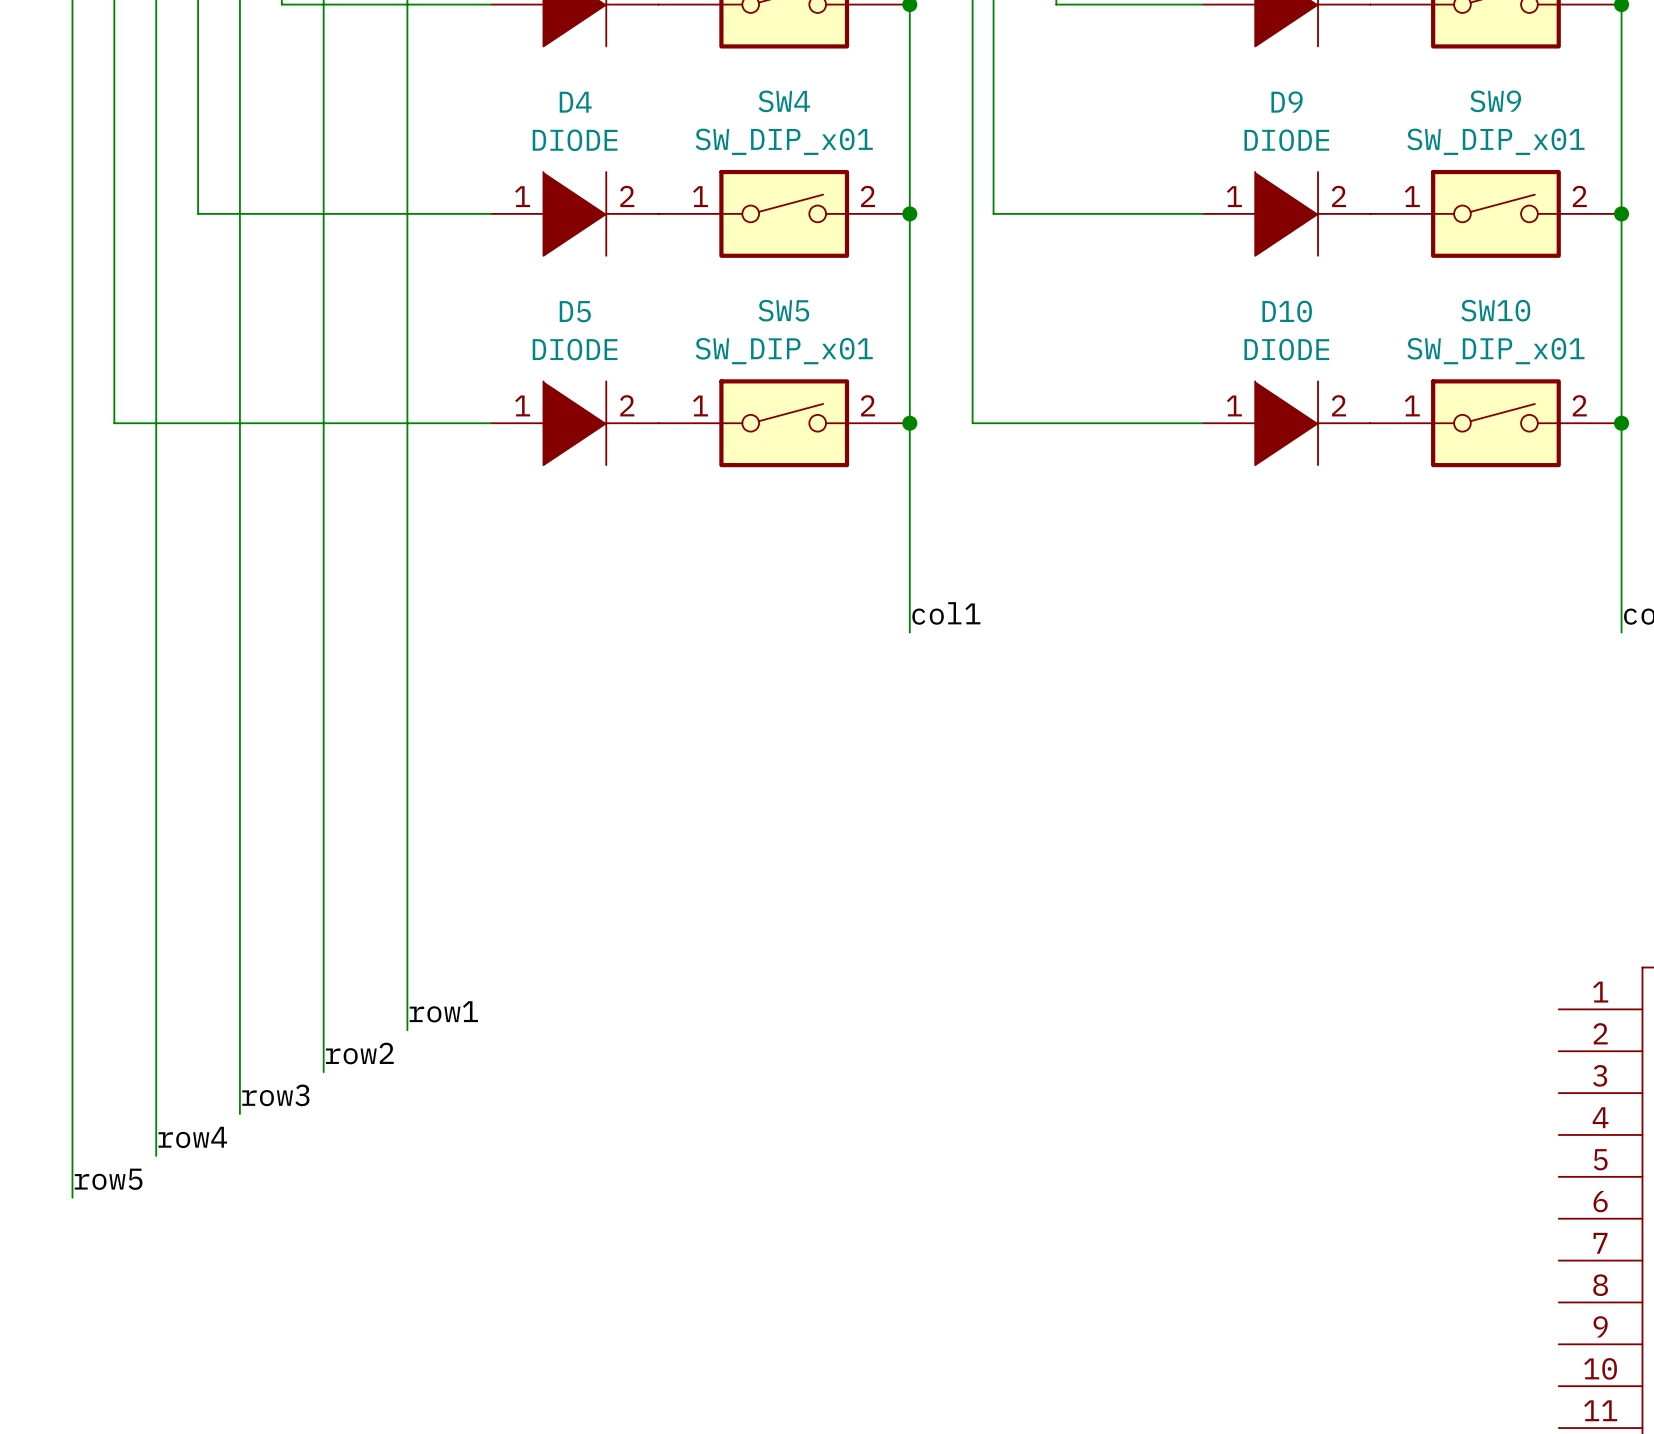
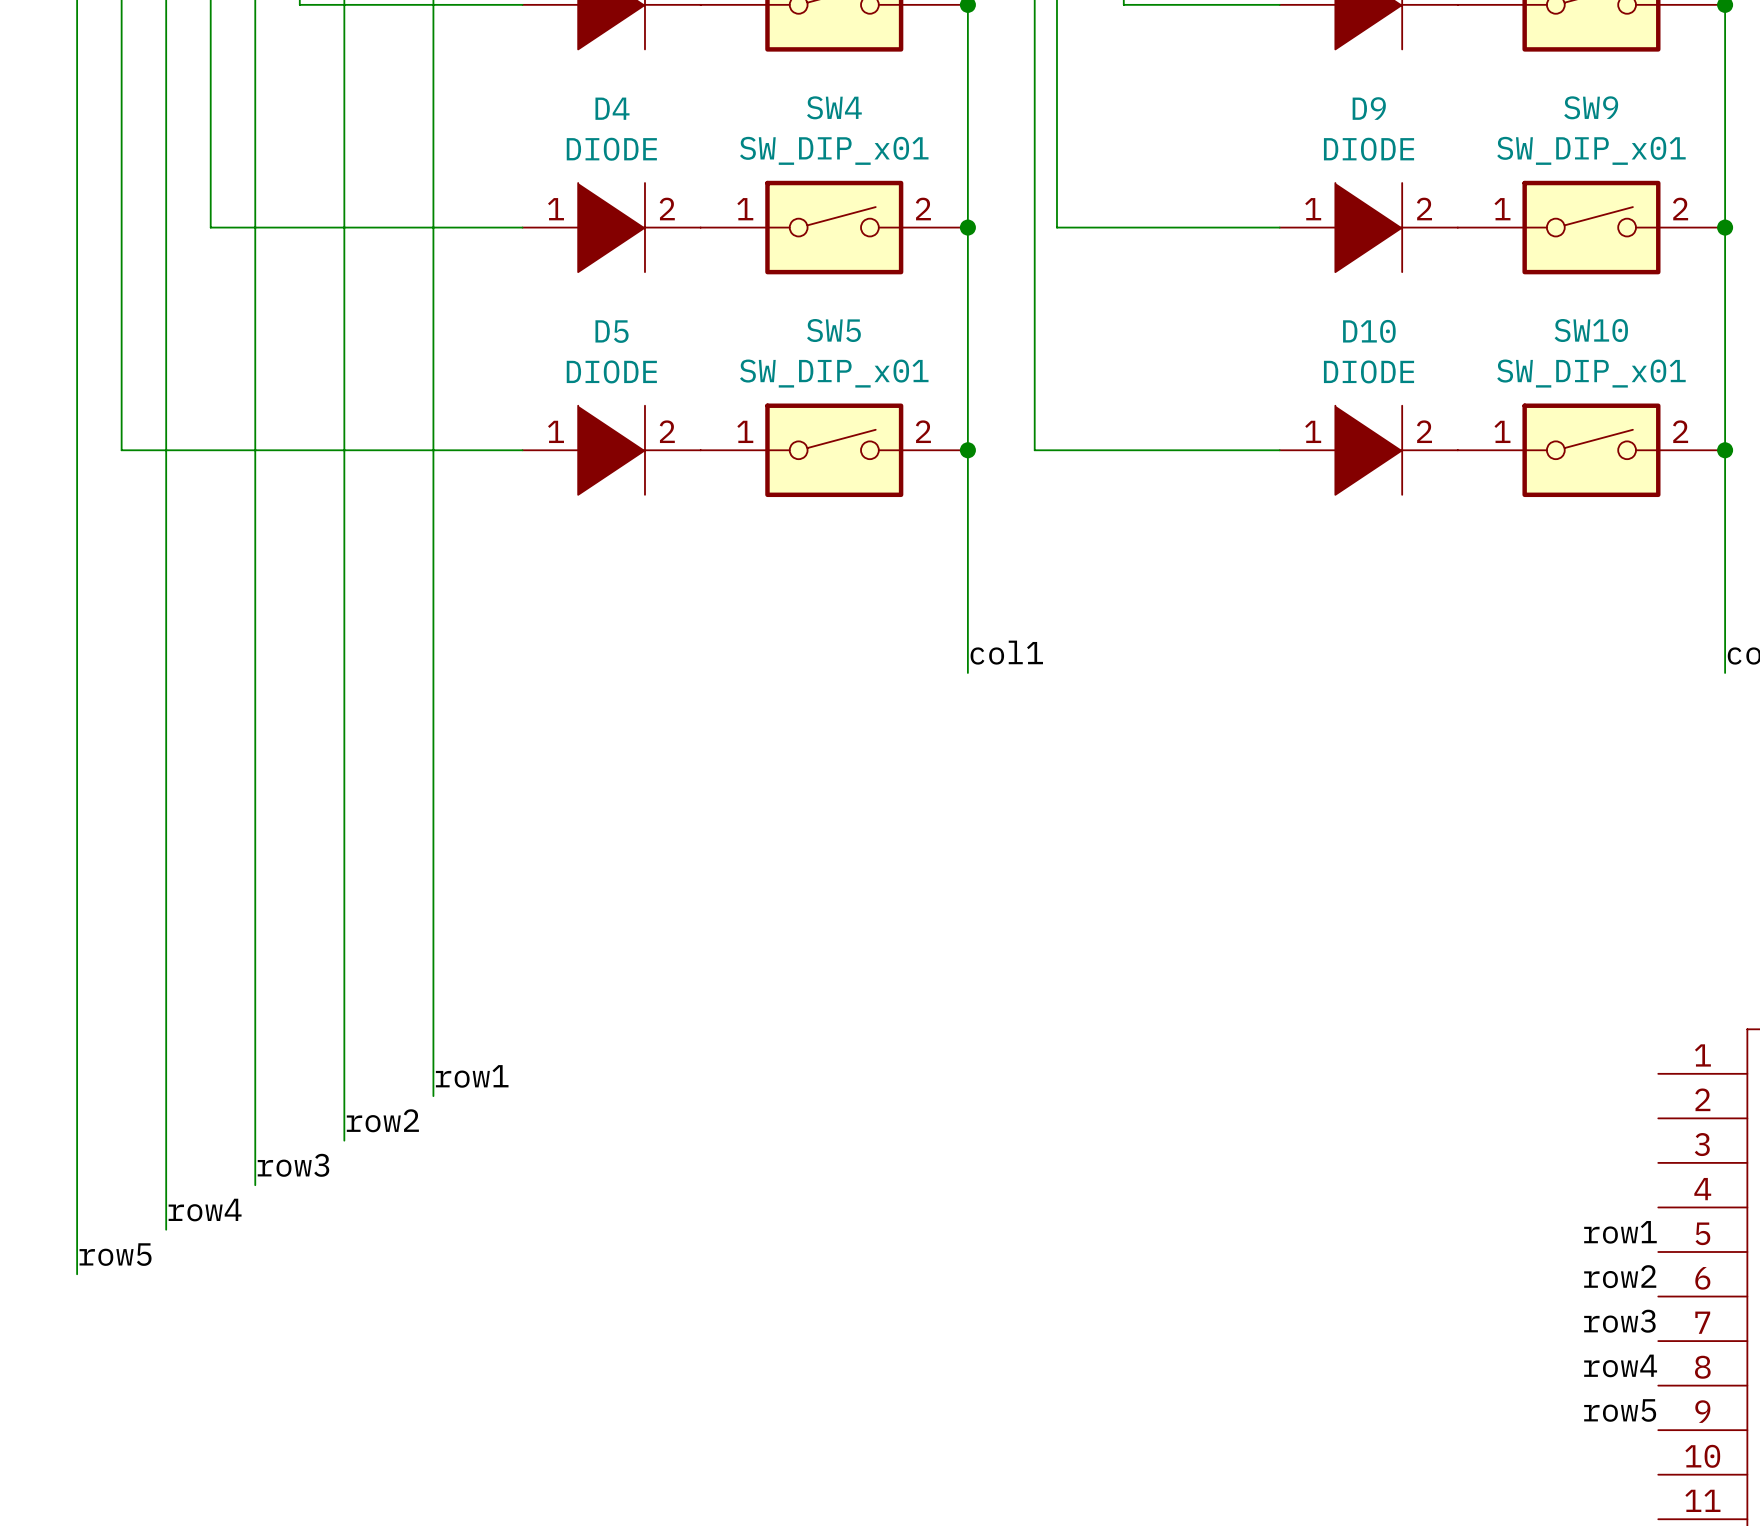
label: none -> row1 (1620, 1232)
label: none -> row2 (1620, 1276)
label: none -> row3 (1619, 1321)
label: none -> row4 (1620, 1365)
label: none -> row5 (1620, 1410)

